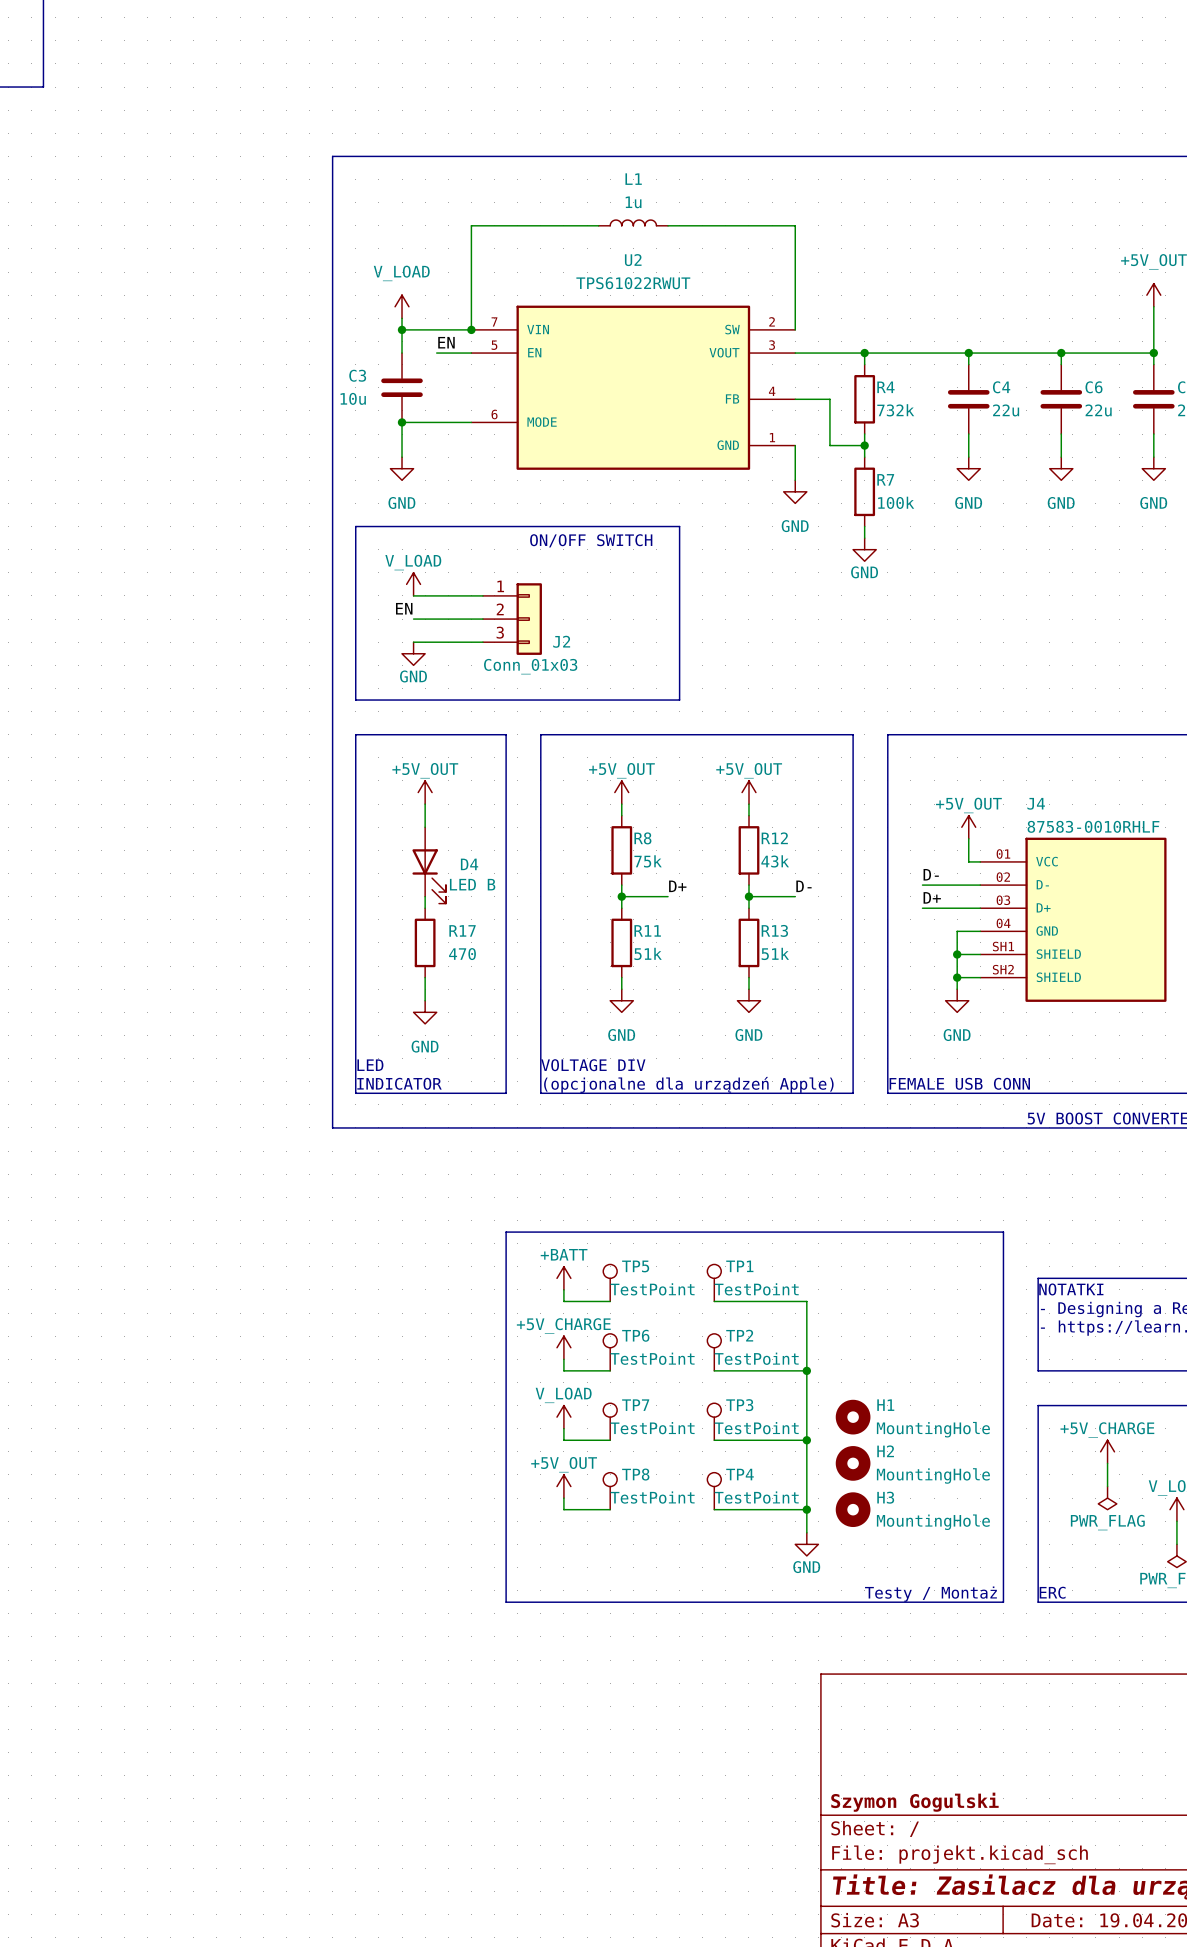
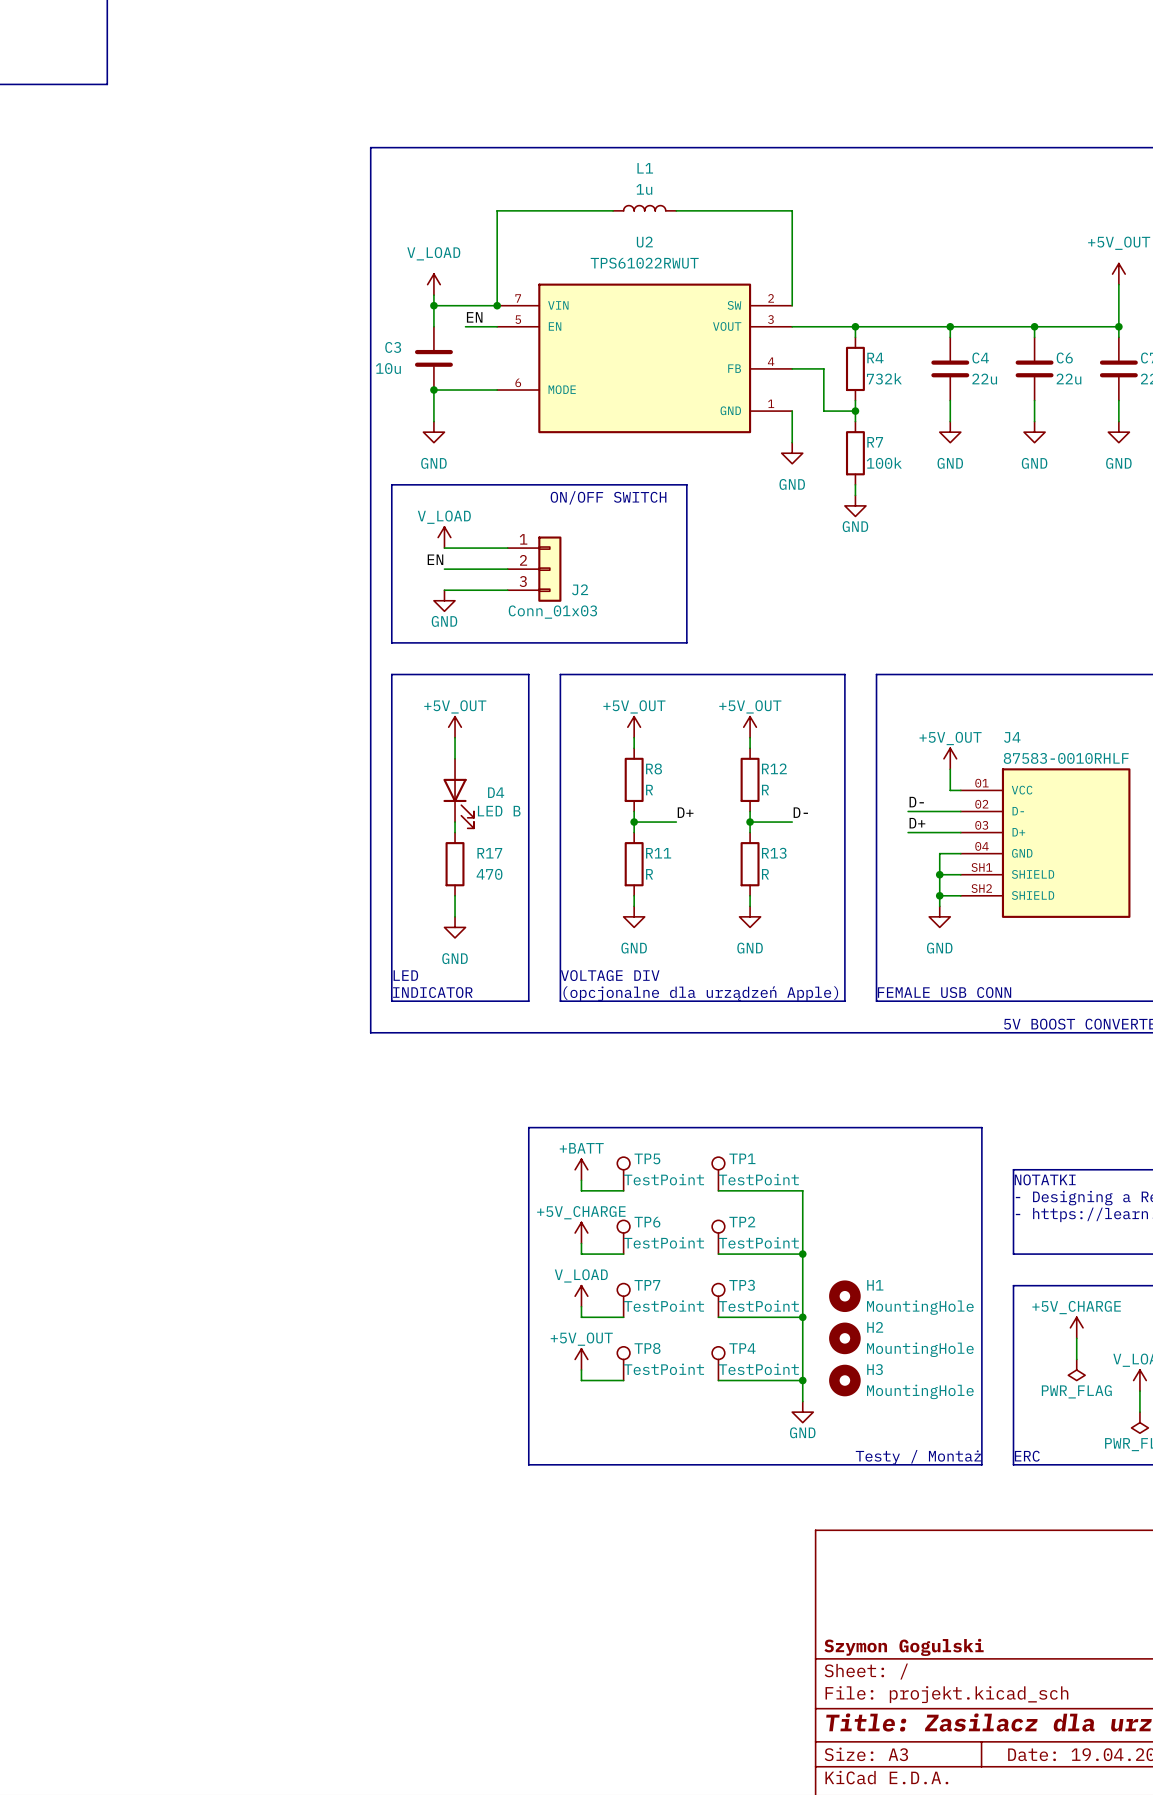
R8 value: 75k (648, 861) -> R (649, 790)
R12 value: 43k (775, 861) -> R (765, 790)
R11 value: 51k (648, 953) -> R (649, 874)
R13 value: 51k (775, 953) -> R (765, 874)

